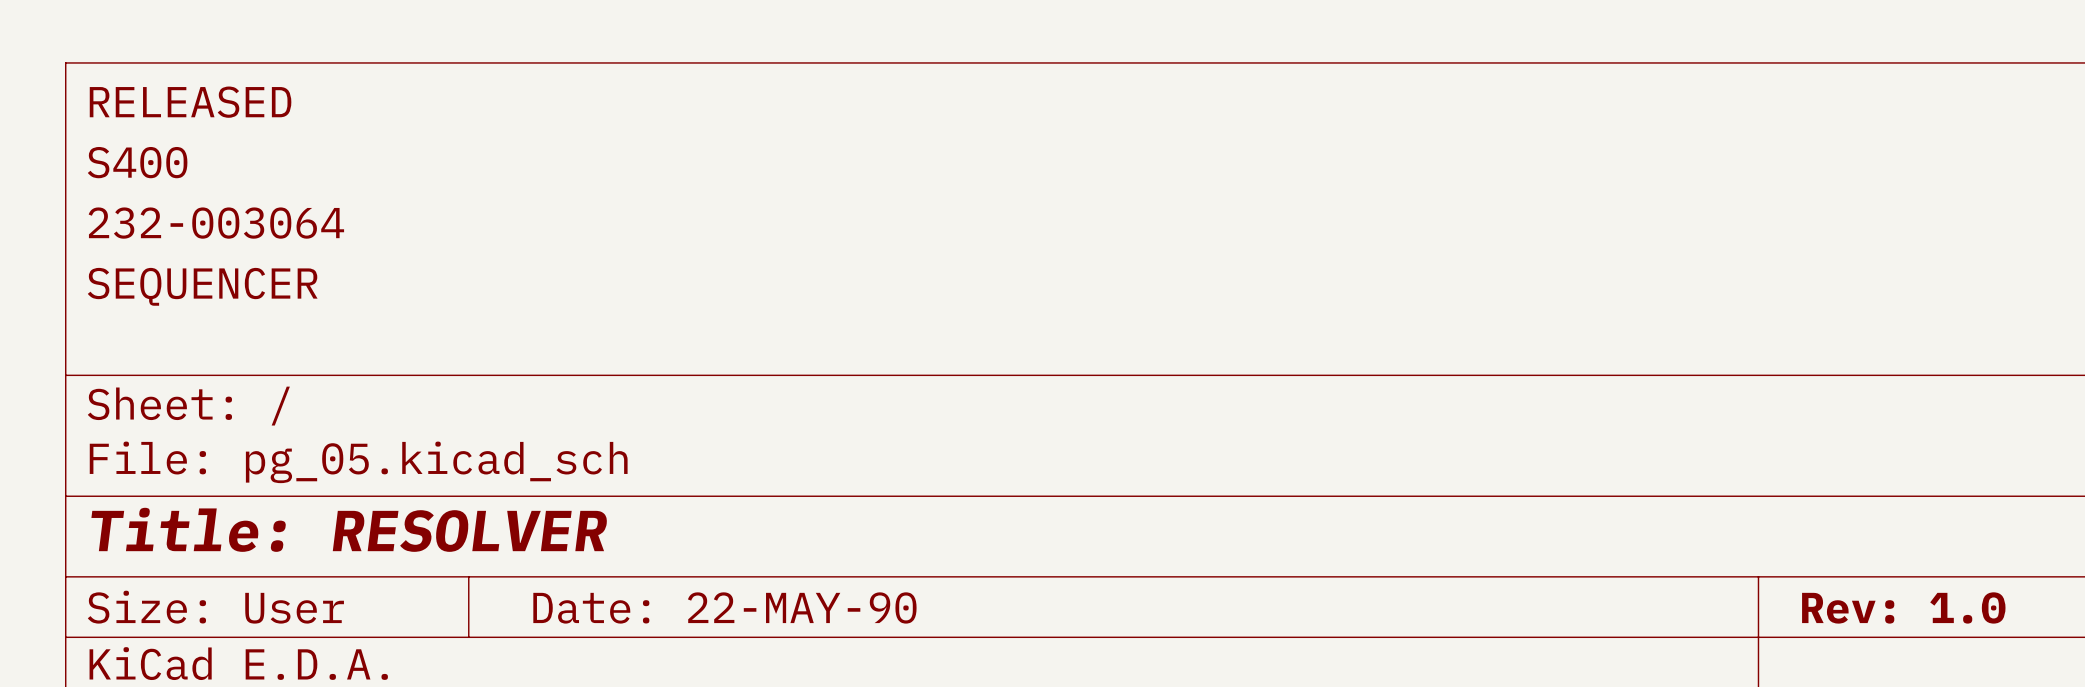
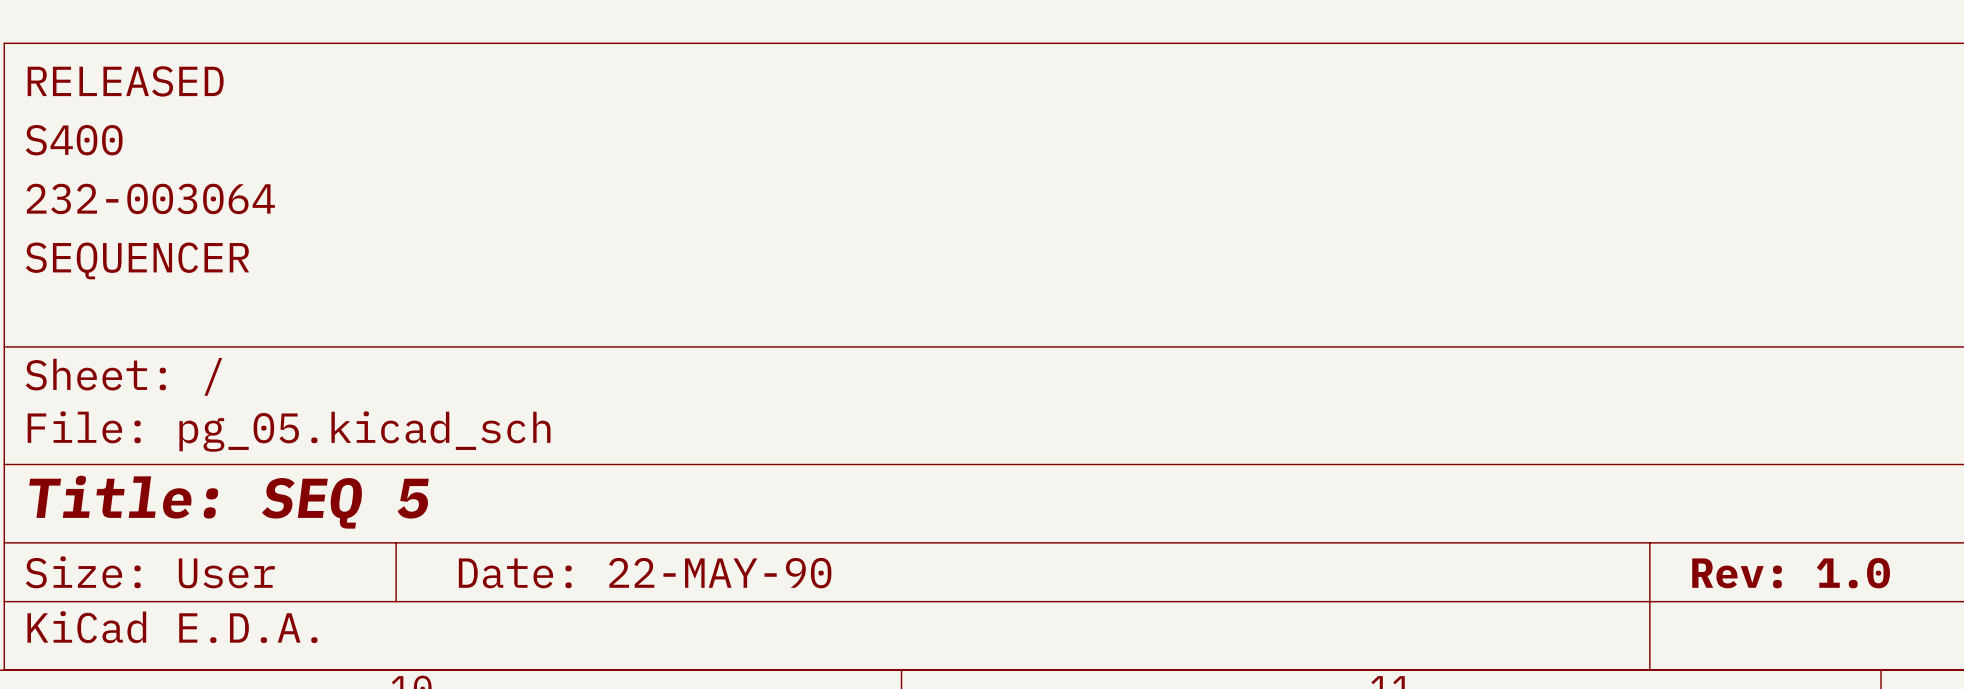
title block: Title: RESOLVER (349, 529) -> Title: SEQ 5 (229, 502)

